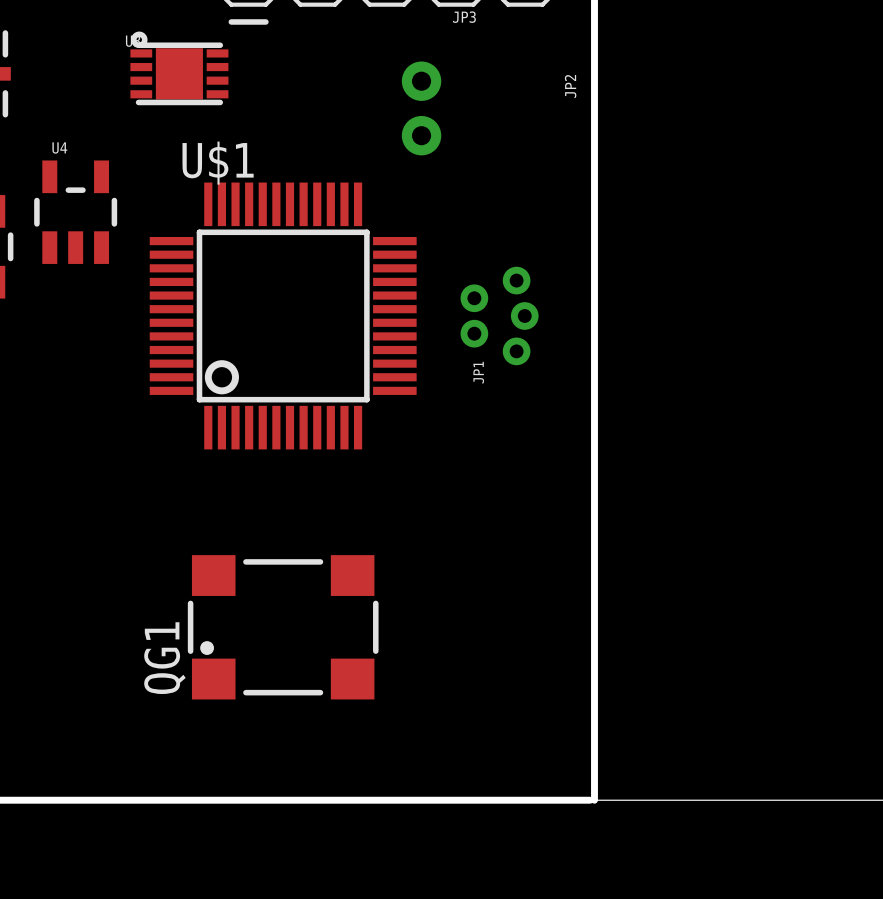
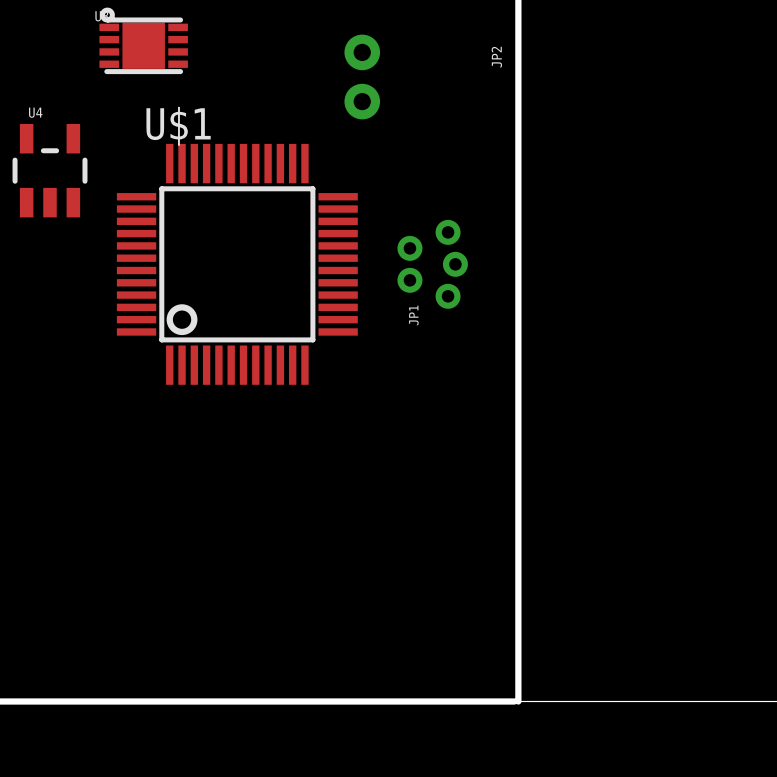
QG1: (283, 627) -> none

